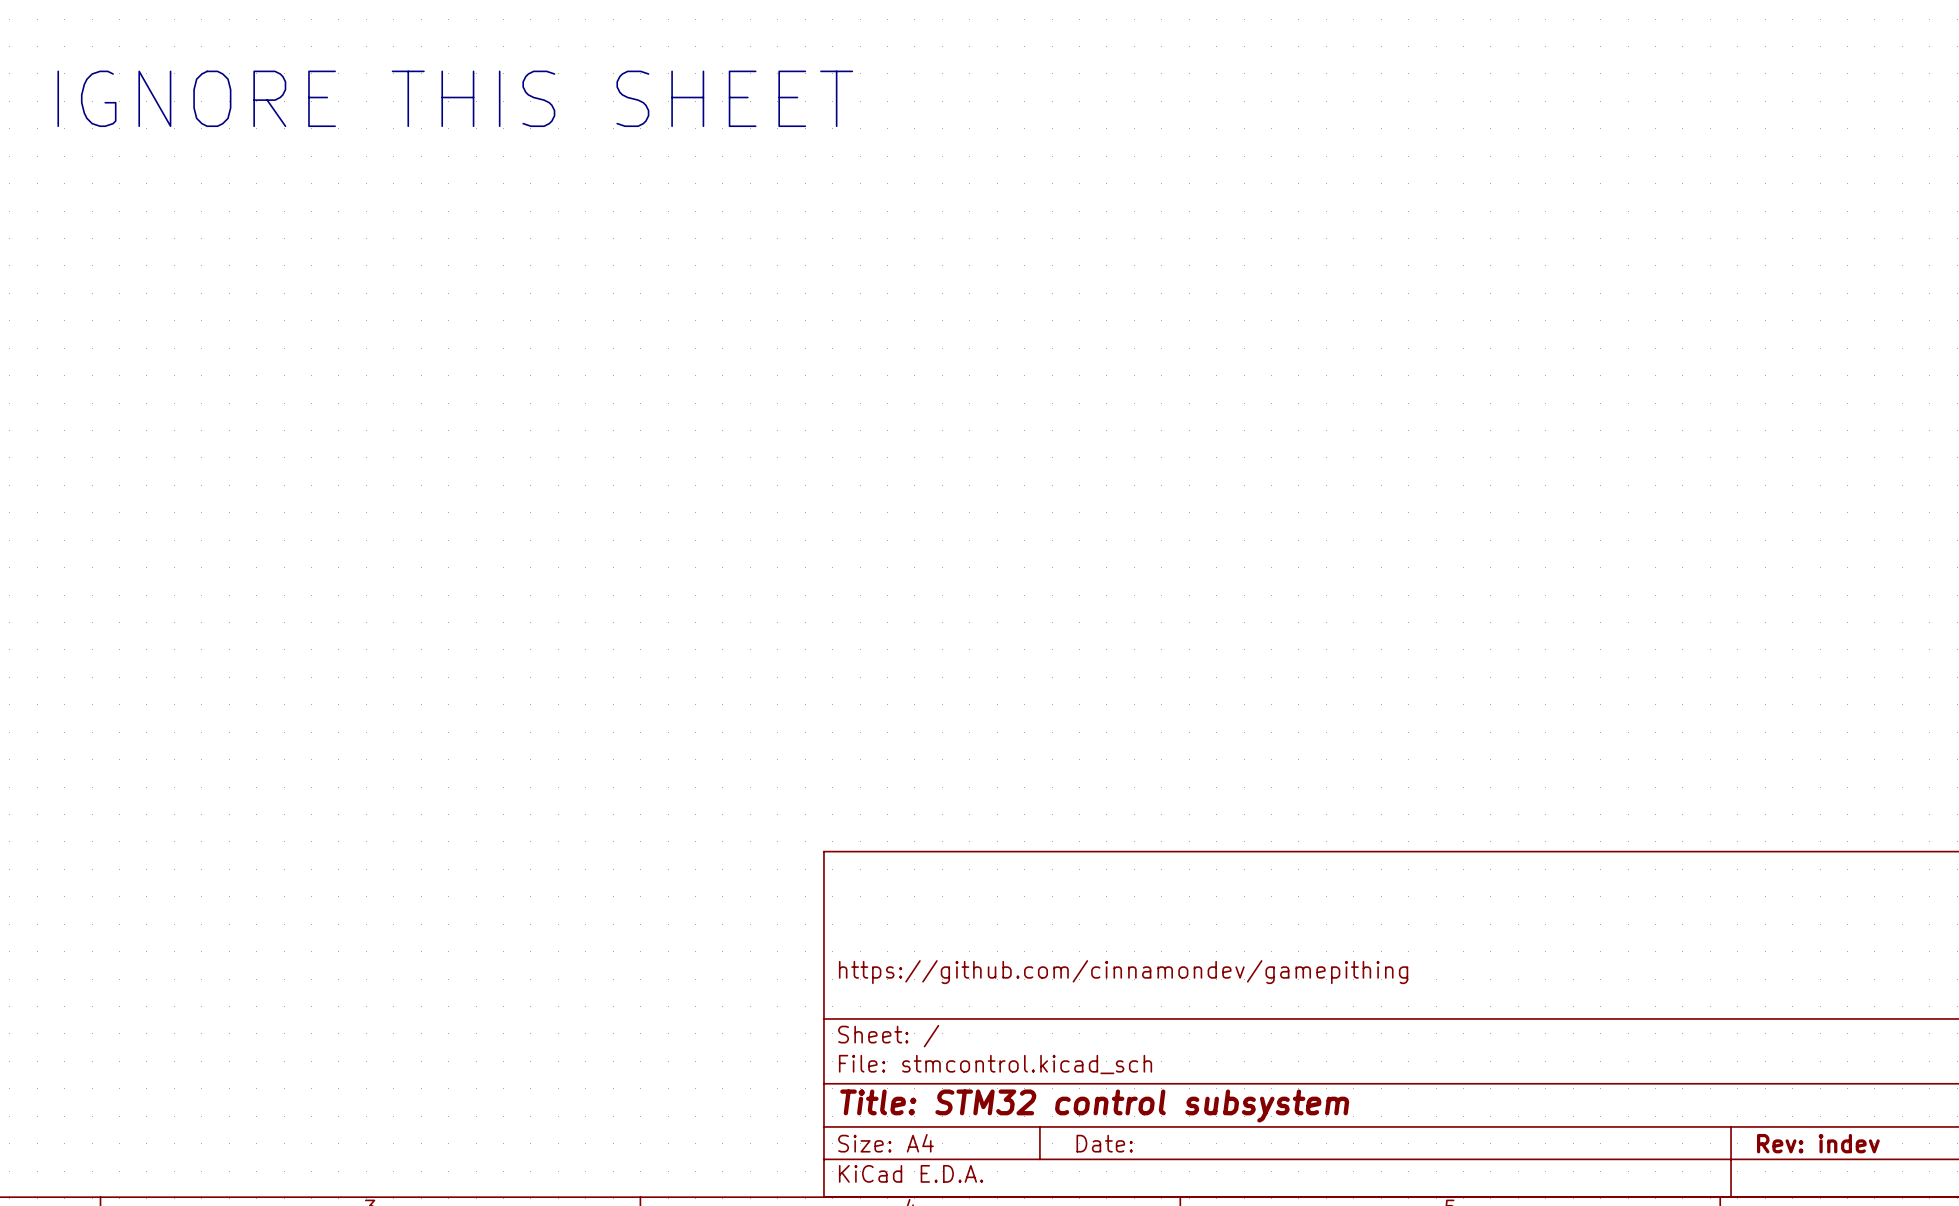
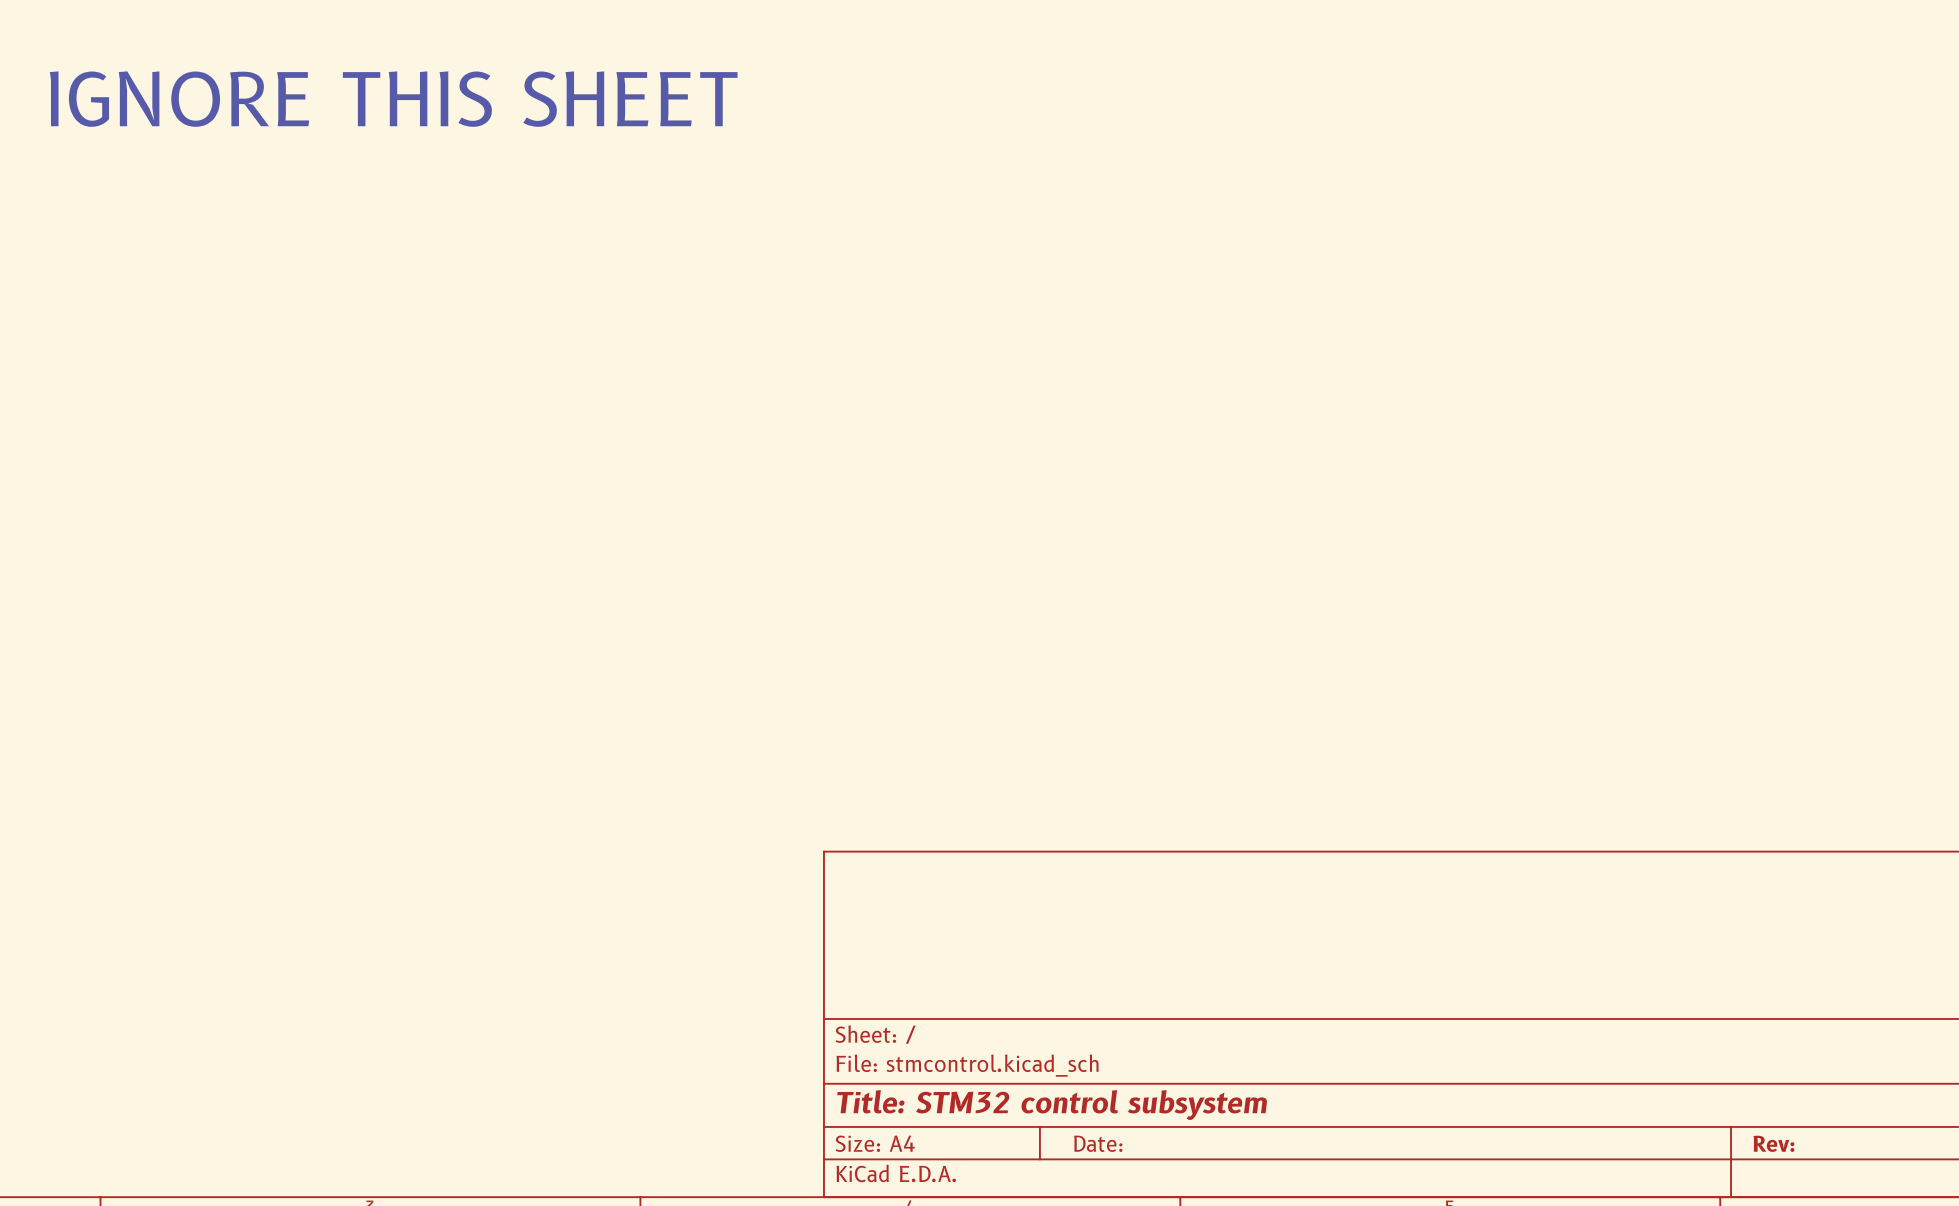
title block: https://github.com/cinnamondev/gamepithing (1123, 972) -> none
title block: Rev: indev (1818, 1143) -> Rev: (1773, 1143)

